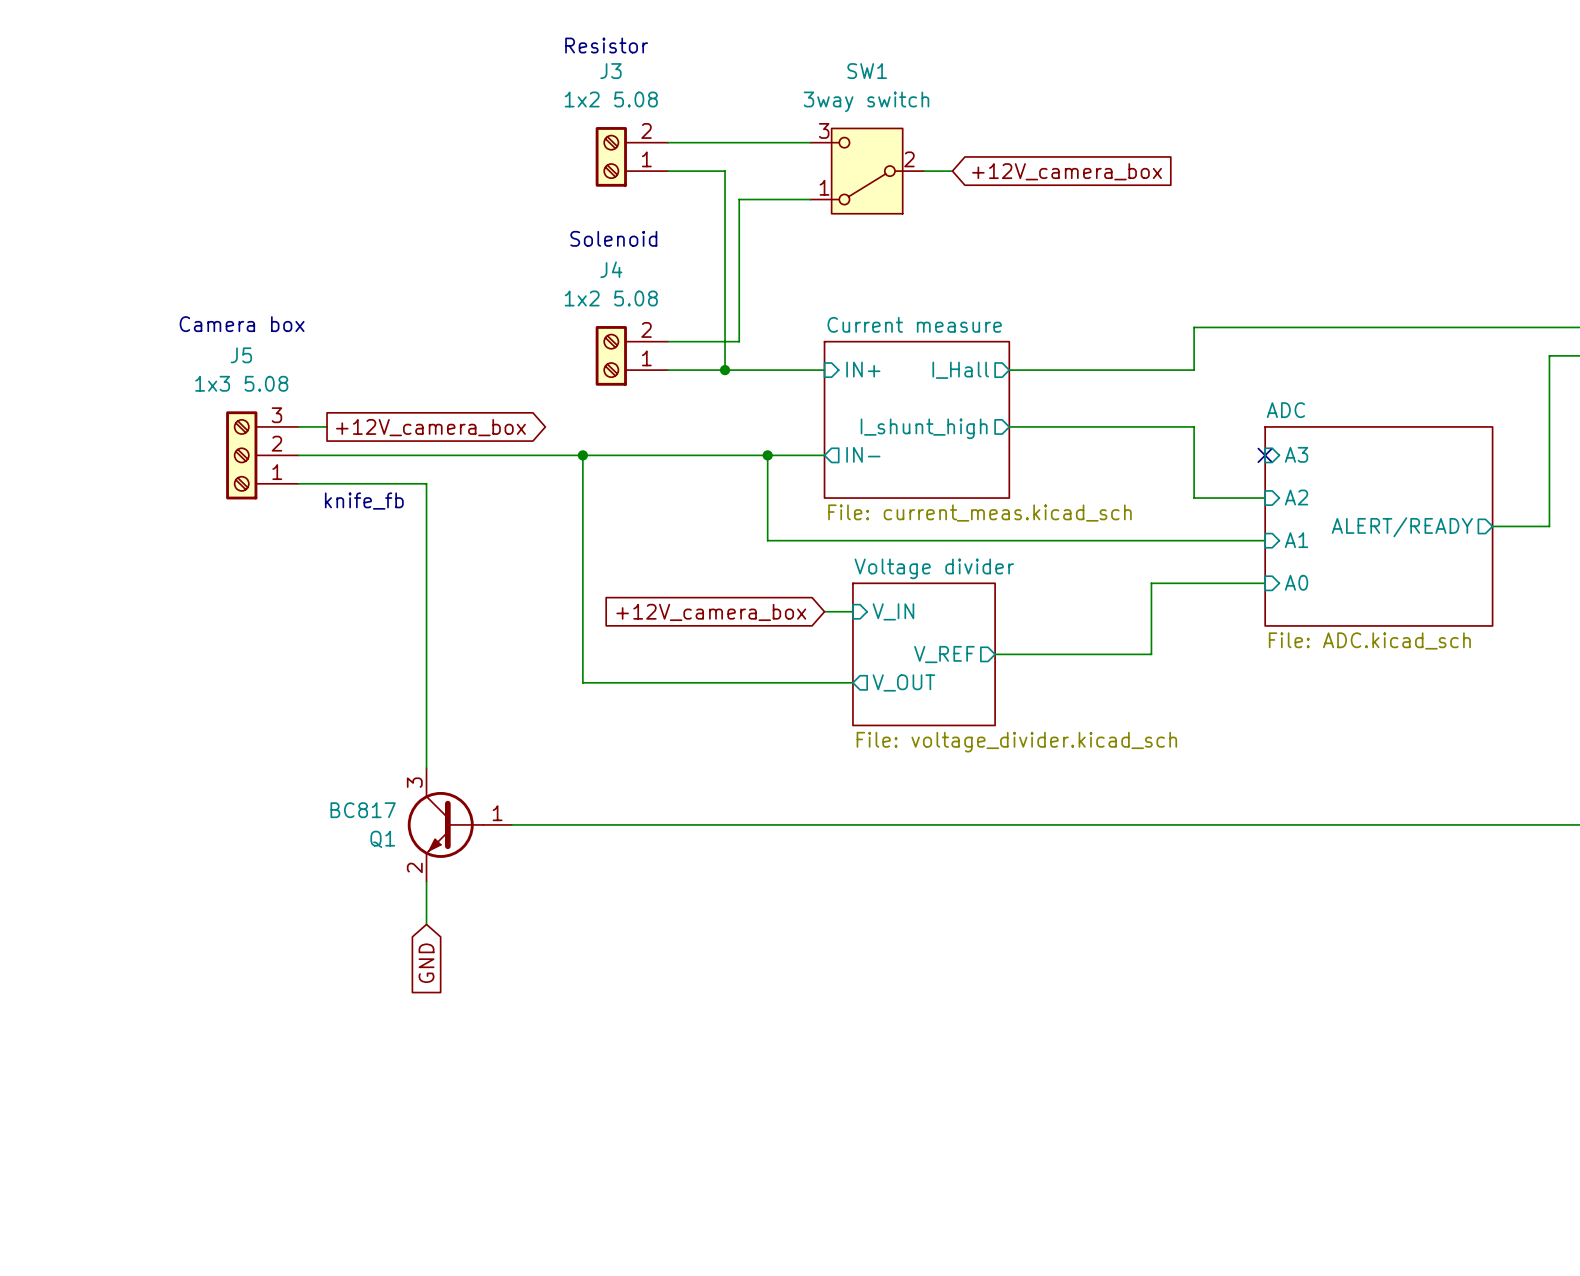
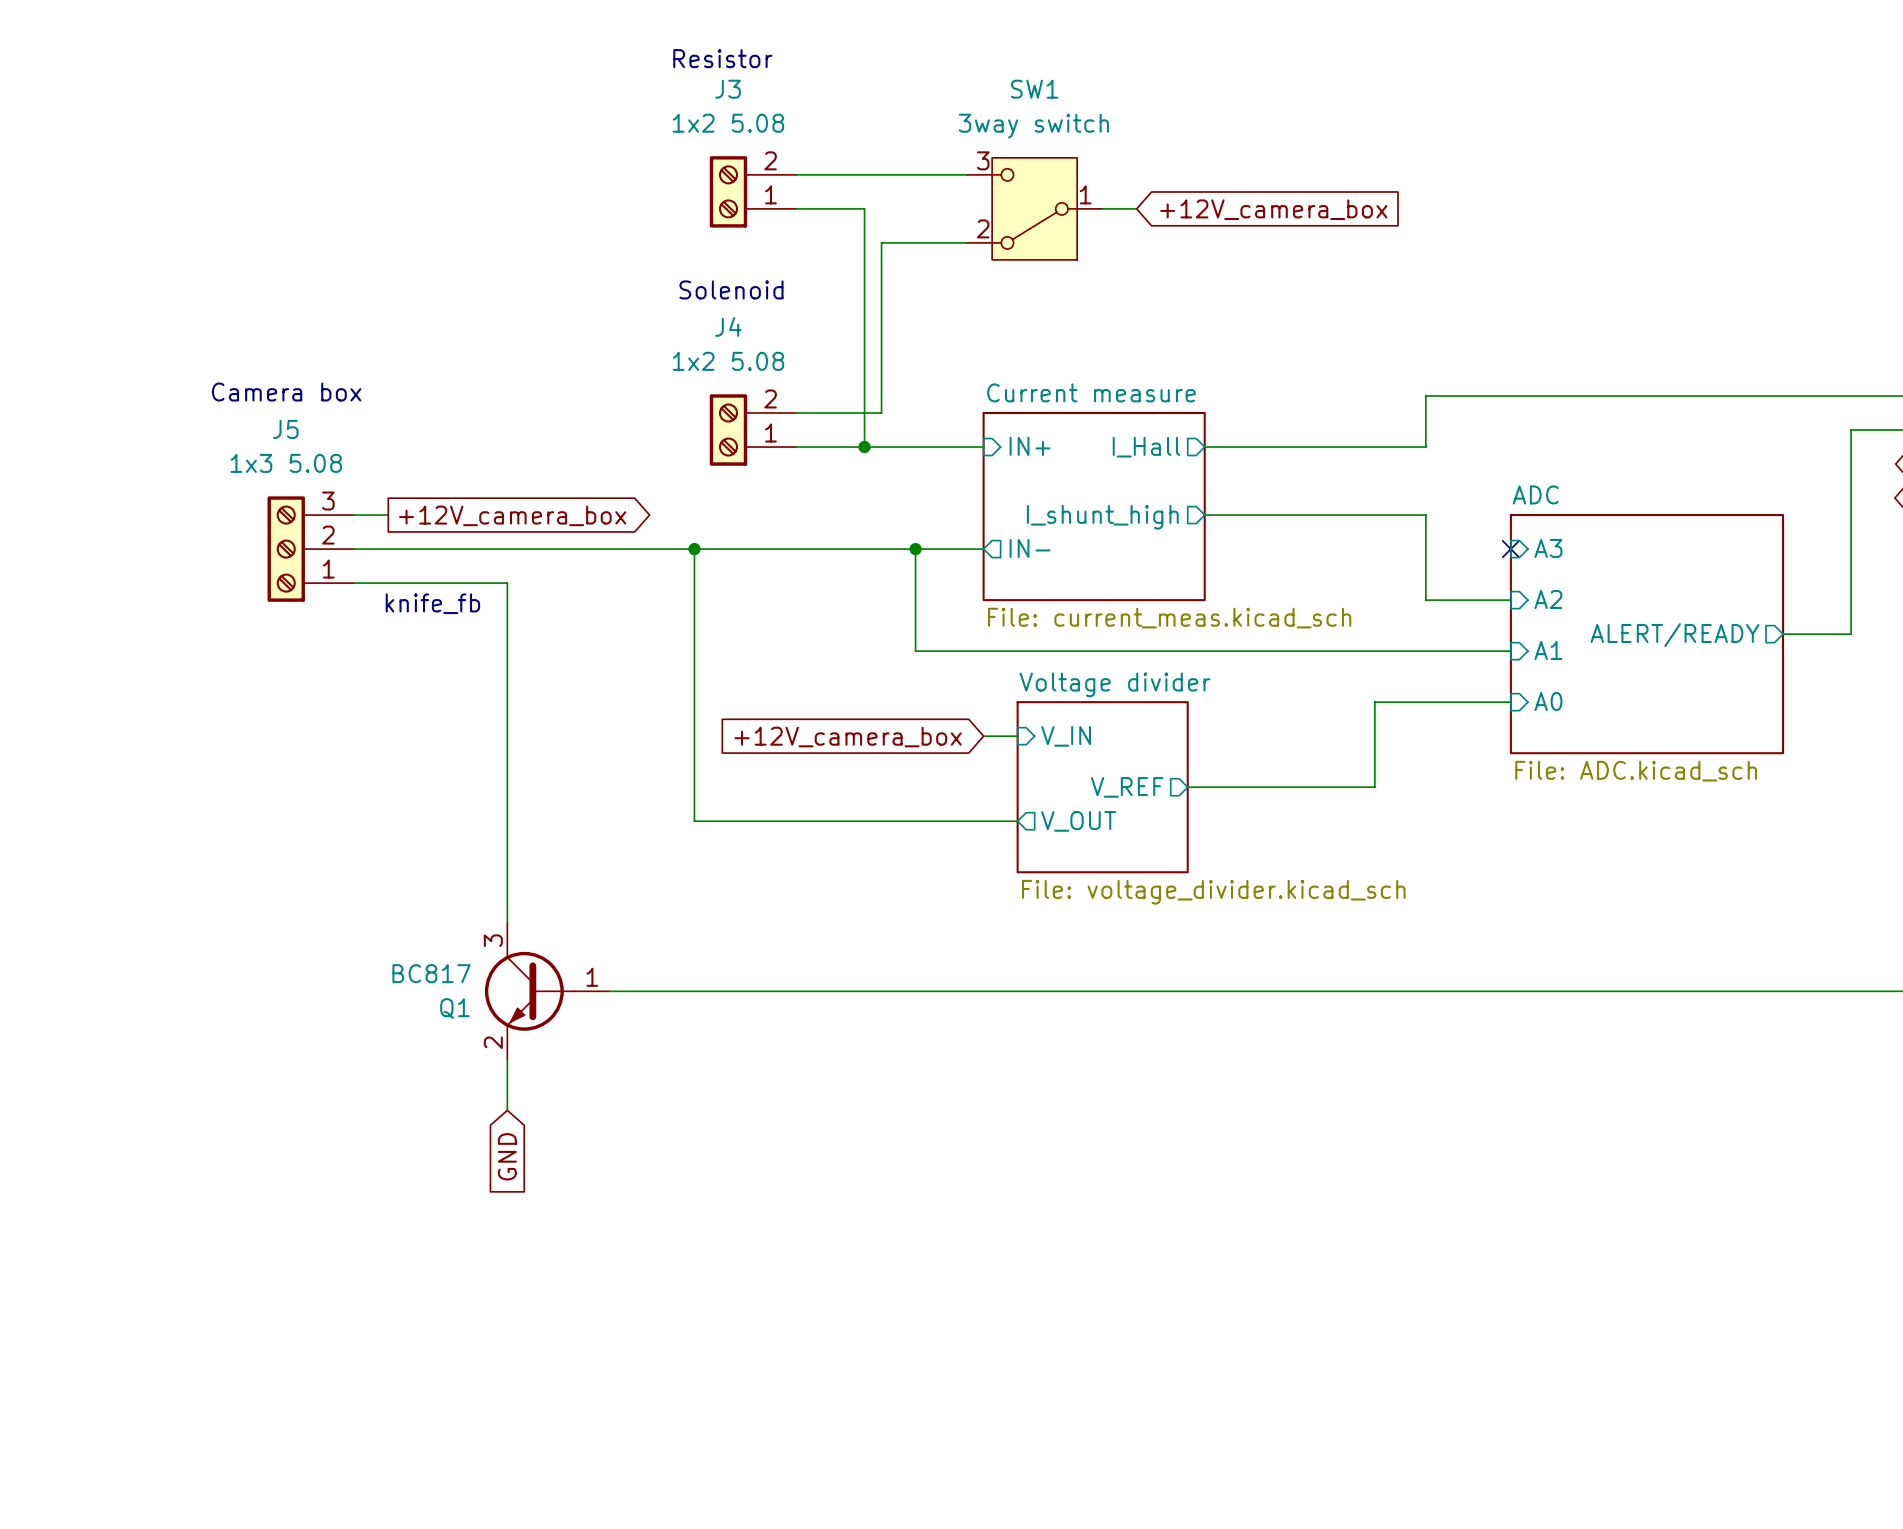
SW1 pin number: 2 (909, 159) -> 1 (1085, 194)
SW1 pin number: 1 (824, 187) -> 2 (983, 228)

